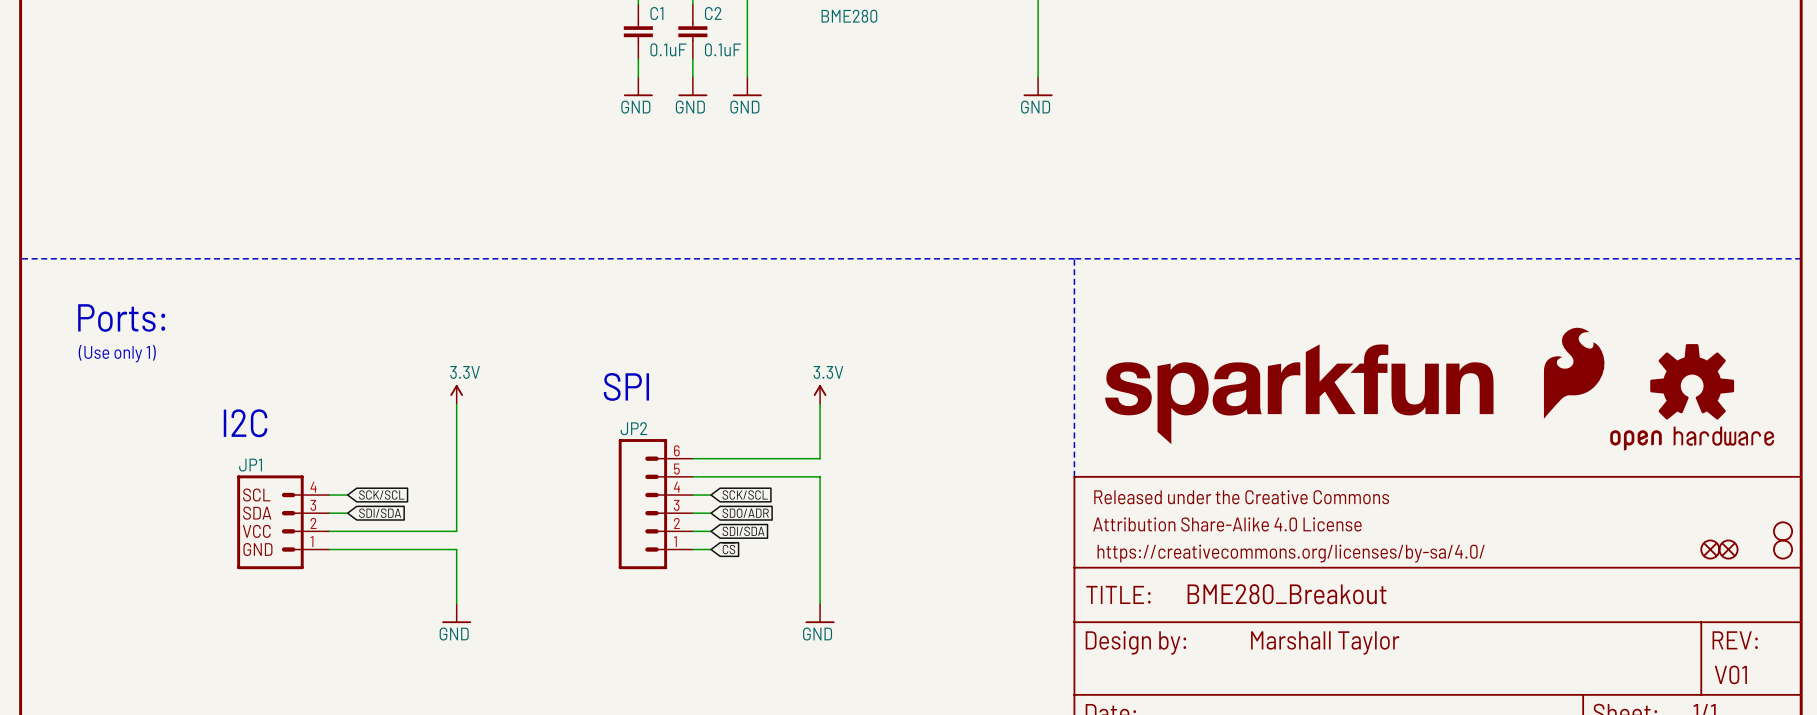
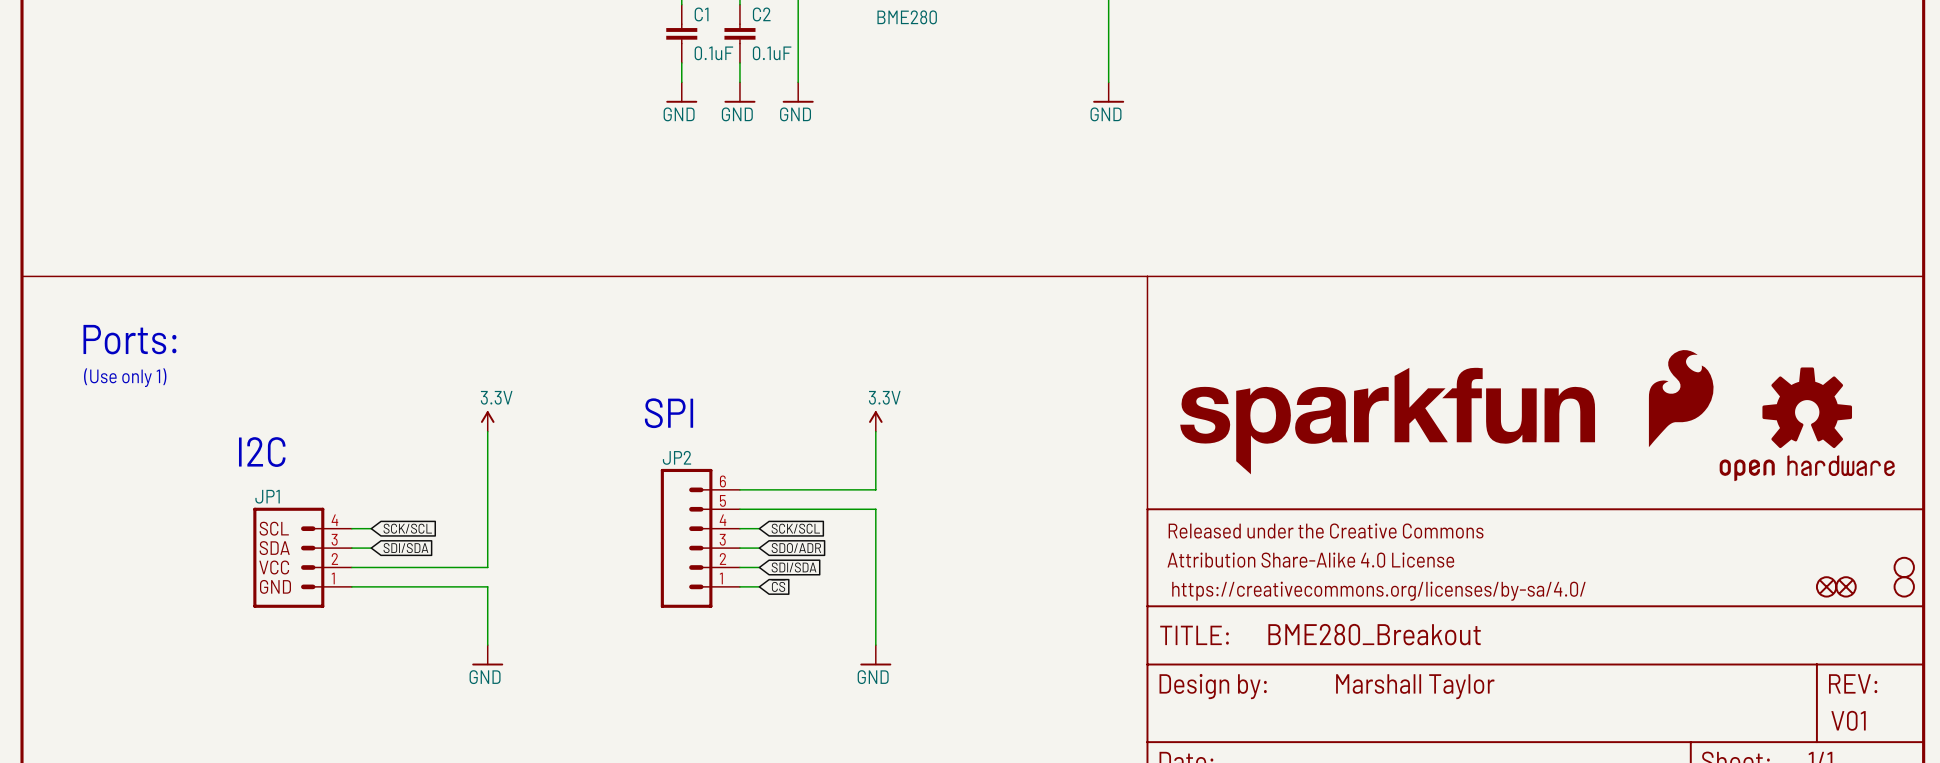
line: (20, 258) (1801, 258) -> none
line: none -> (22, 276) (1923, 276)
line: (1074, 258) (1074, 476) -> none
line: none -> (1147, 276) (1147, 509)

